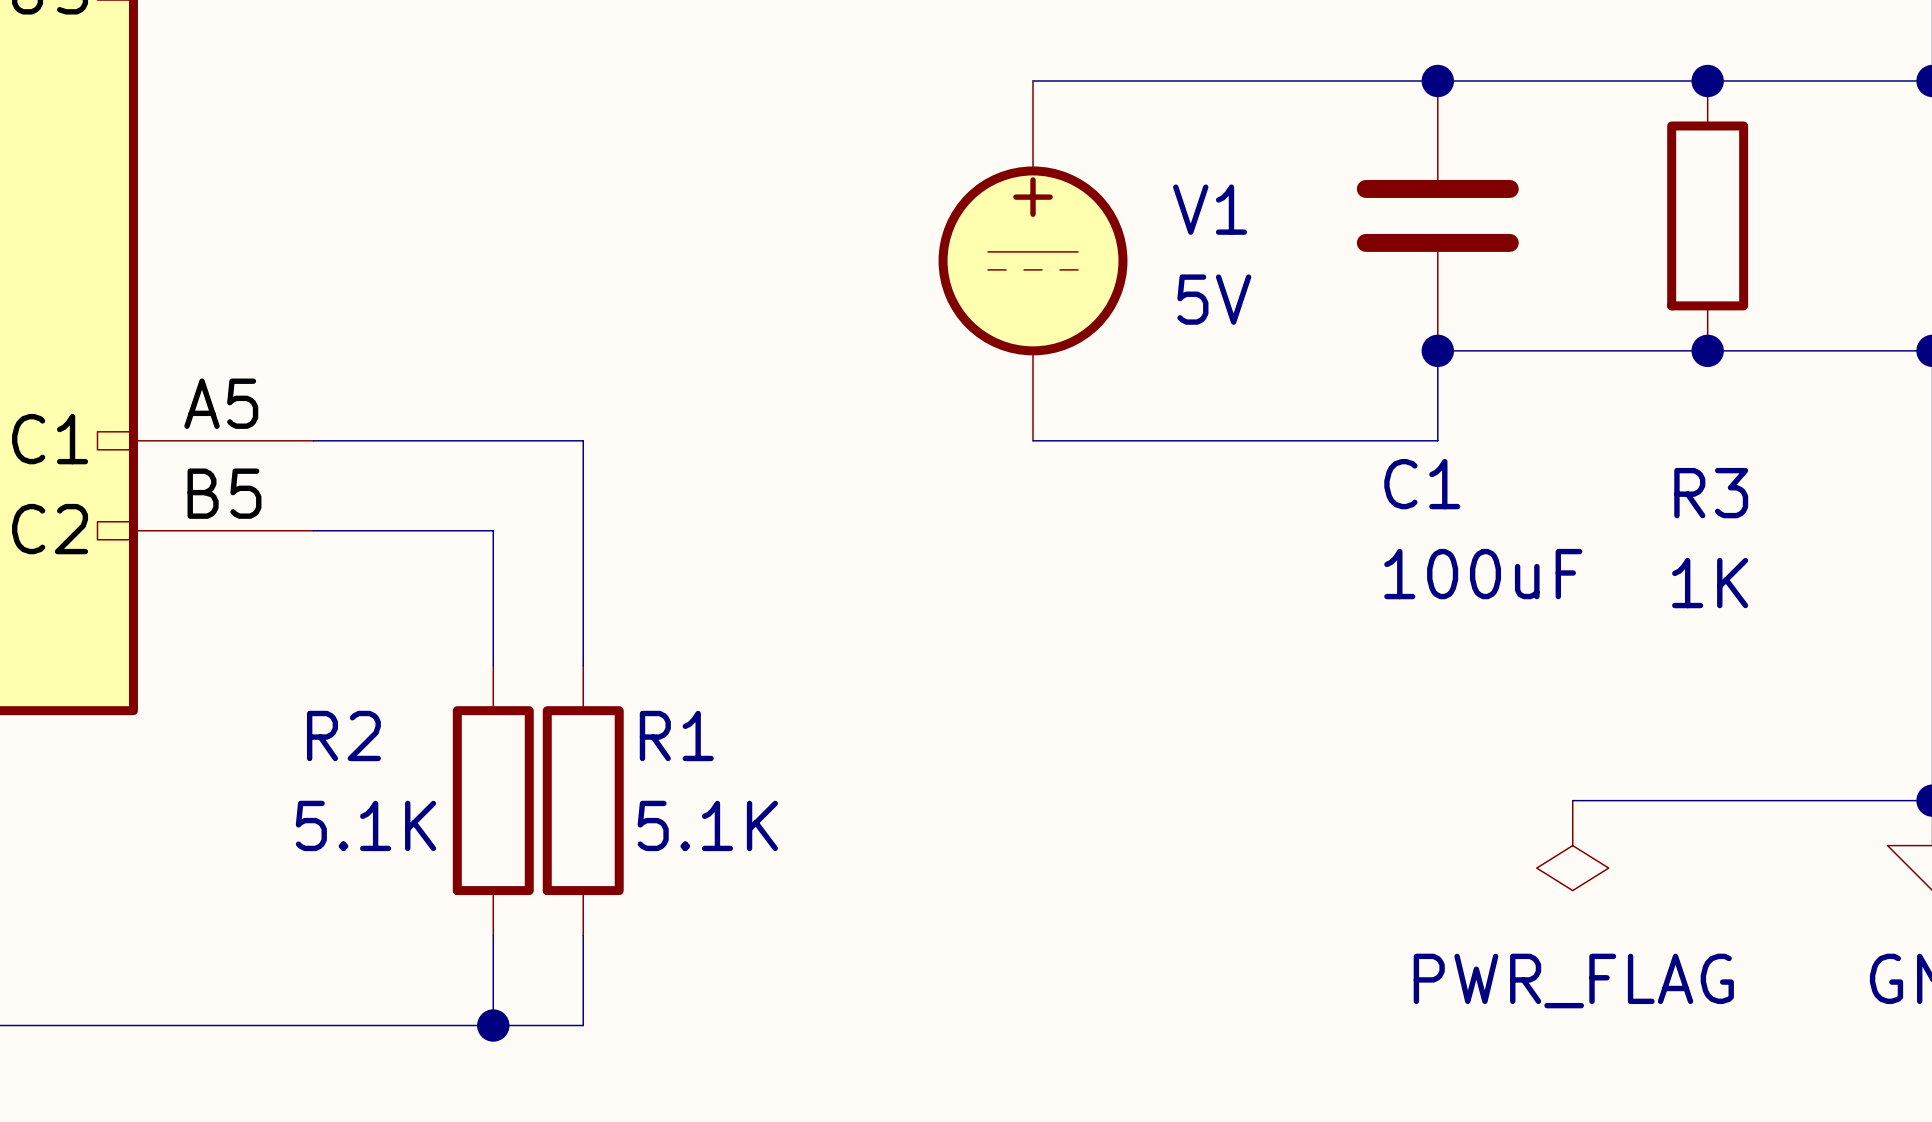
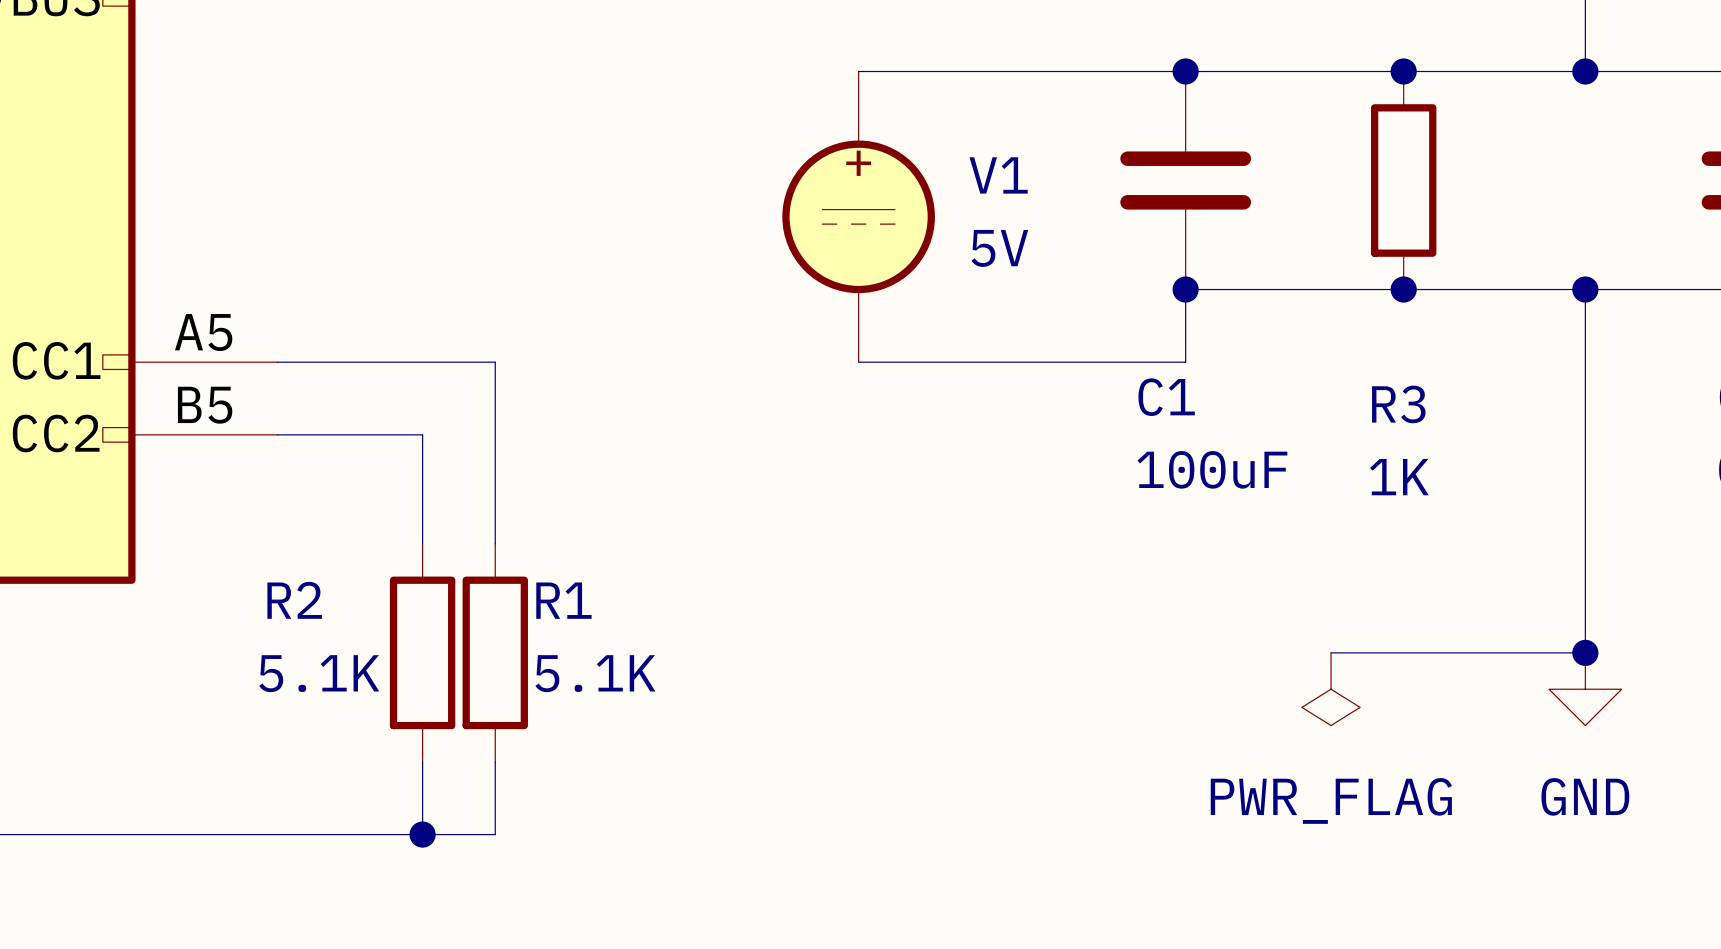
wire: (1572, 800) (1617, 800) -> none
power symbol position: PWR_FLAG (1572, 845) -> PWR_FLAG (1331, 689)

